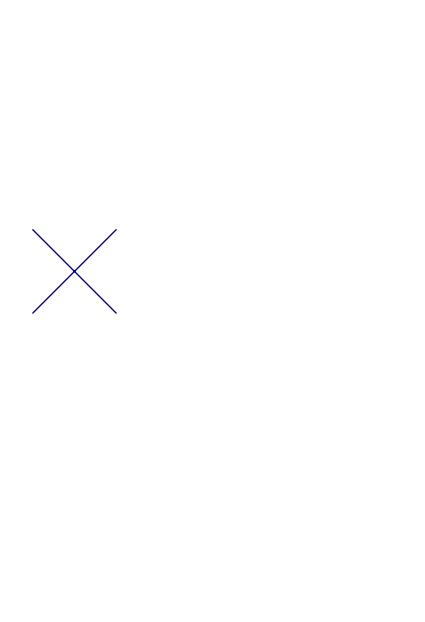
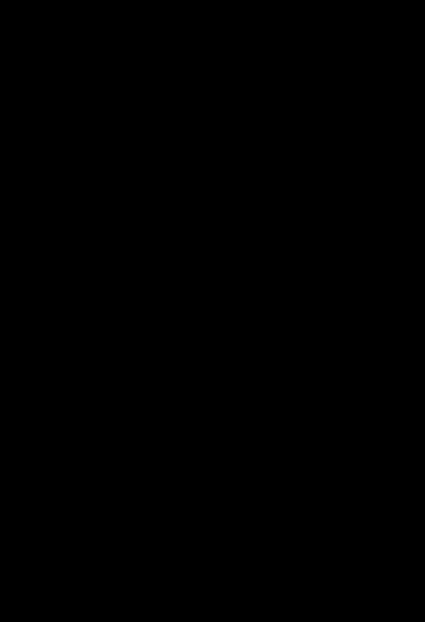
no-connect mark: (74, 271) -> none

